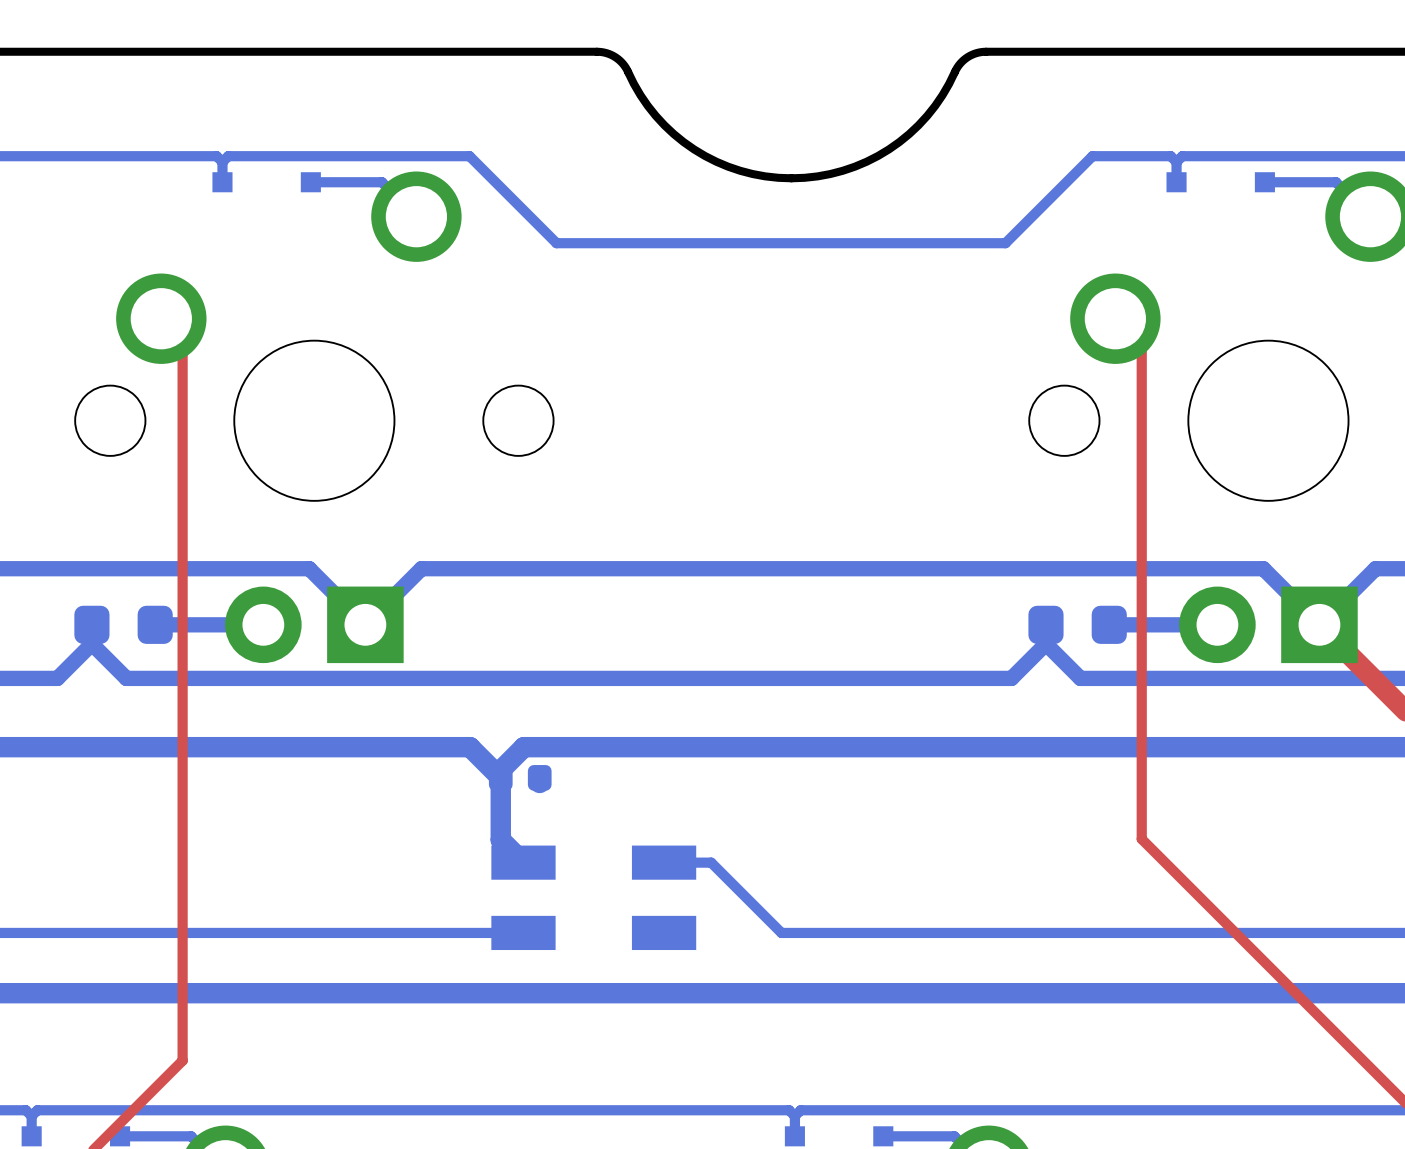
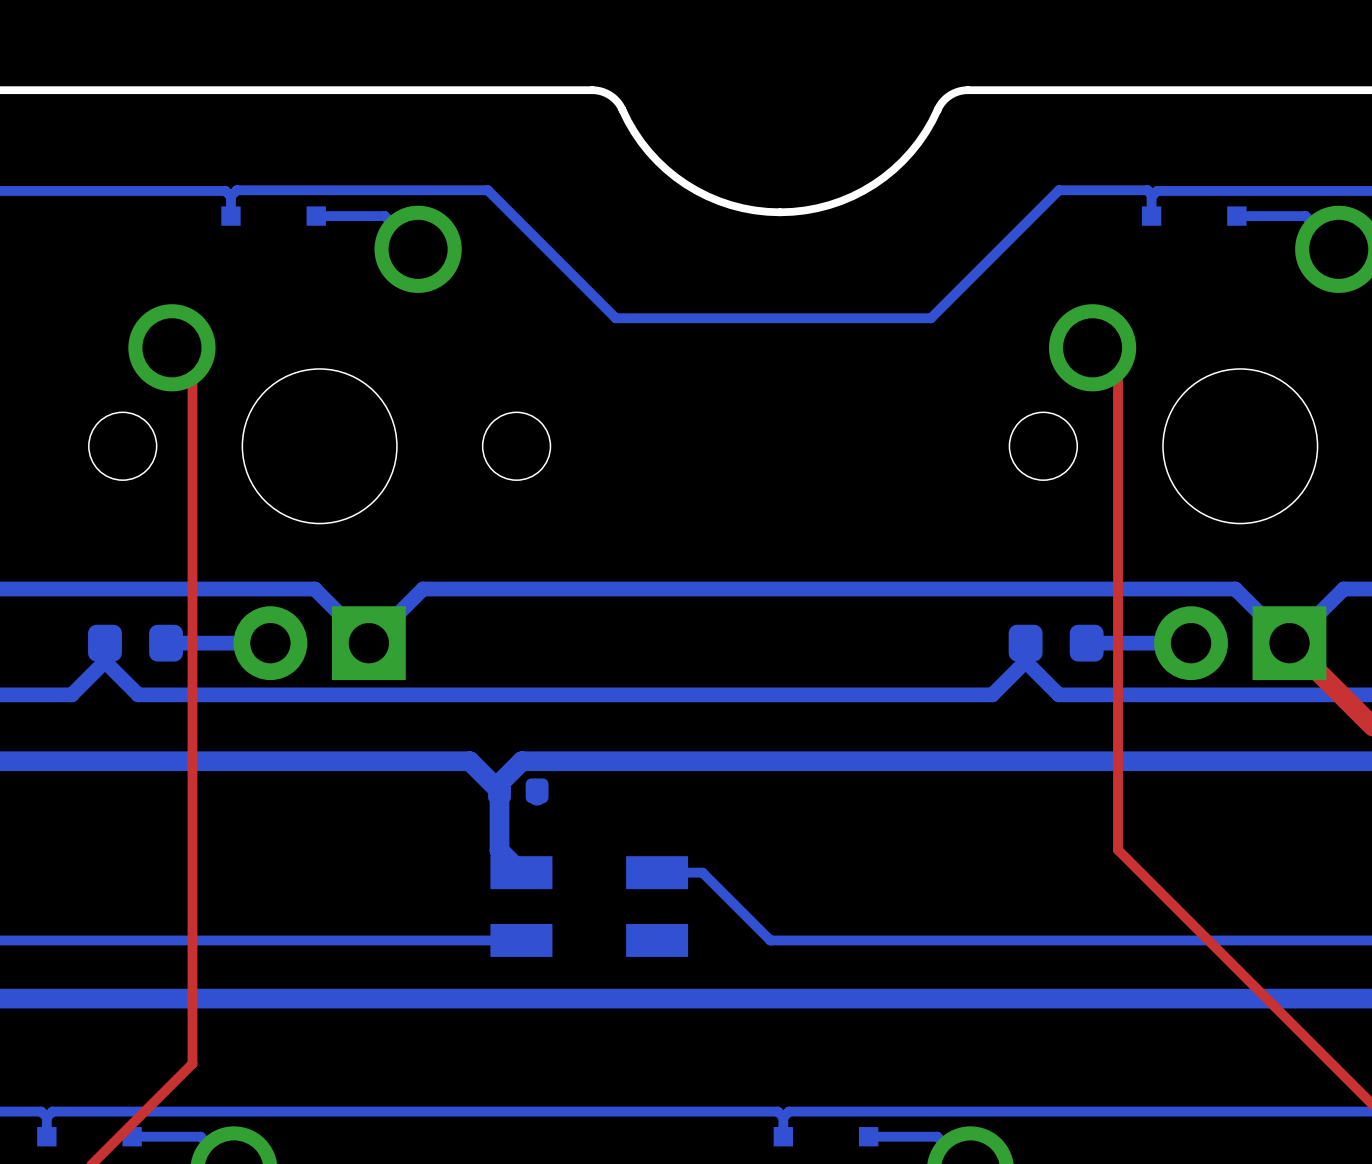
bottom track: (222, 162) (228, 156) (469, 156) (556, 243) (1005, 243) (1092, 156) (1170, 156) (1176, 162) -> (230, 196) (236, 190) (487, 190) (615, 318) (930, 318) (1058, 190) (1147, 190) (1151, 196)

